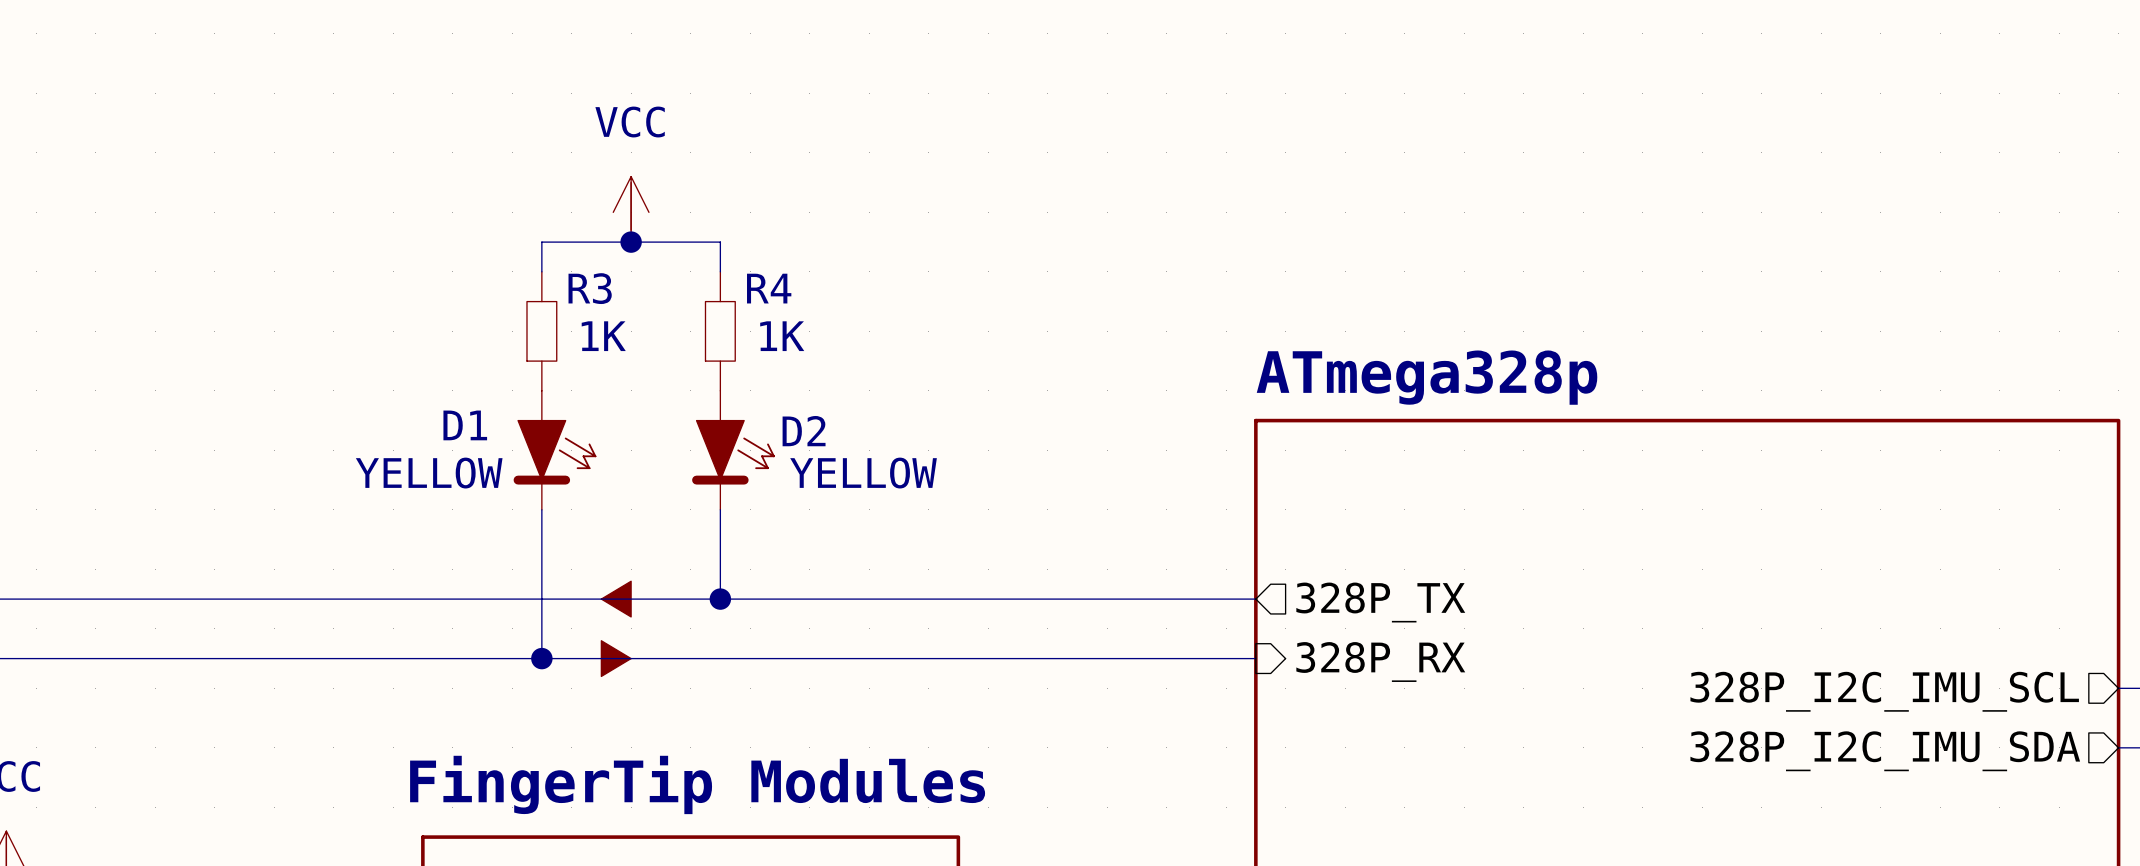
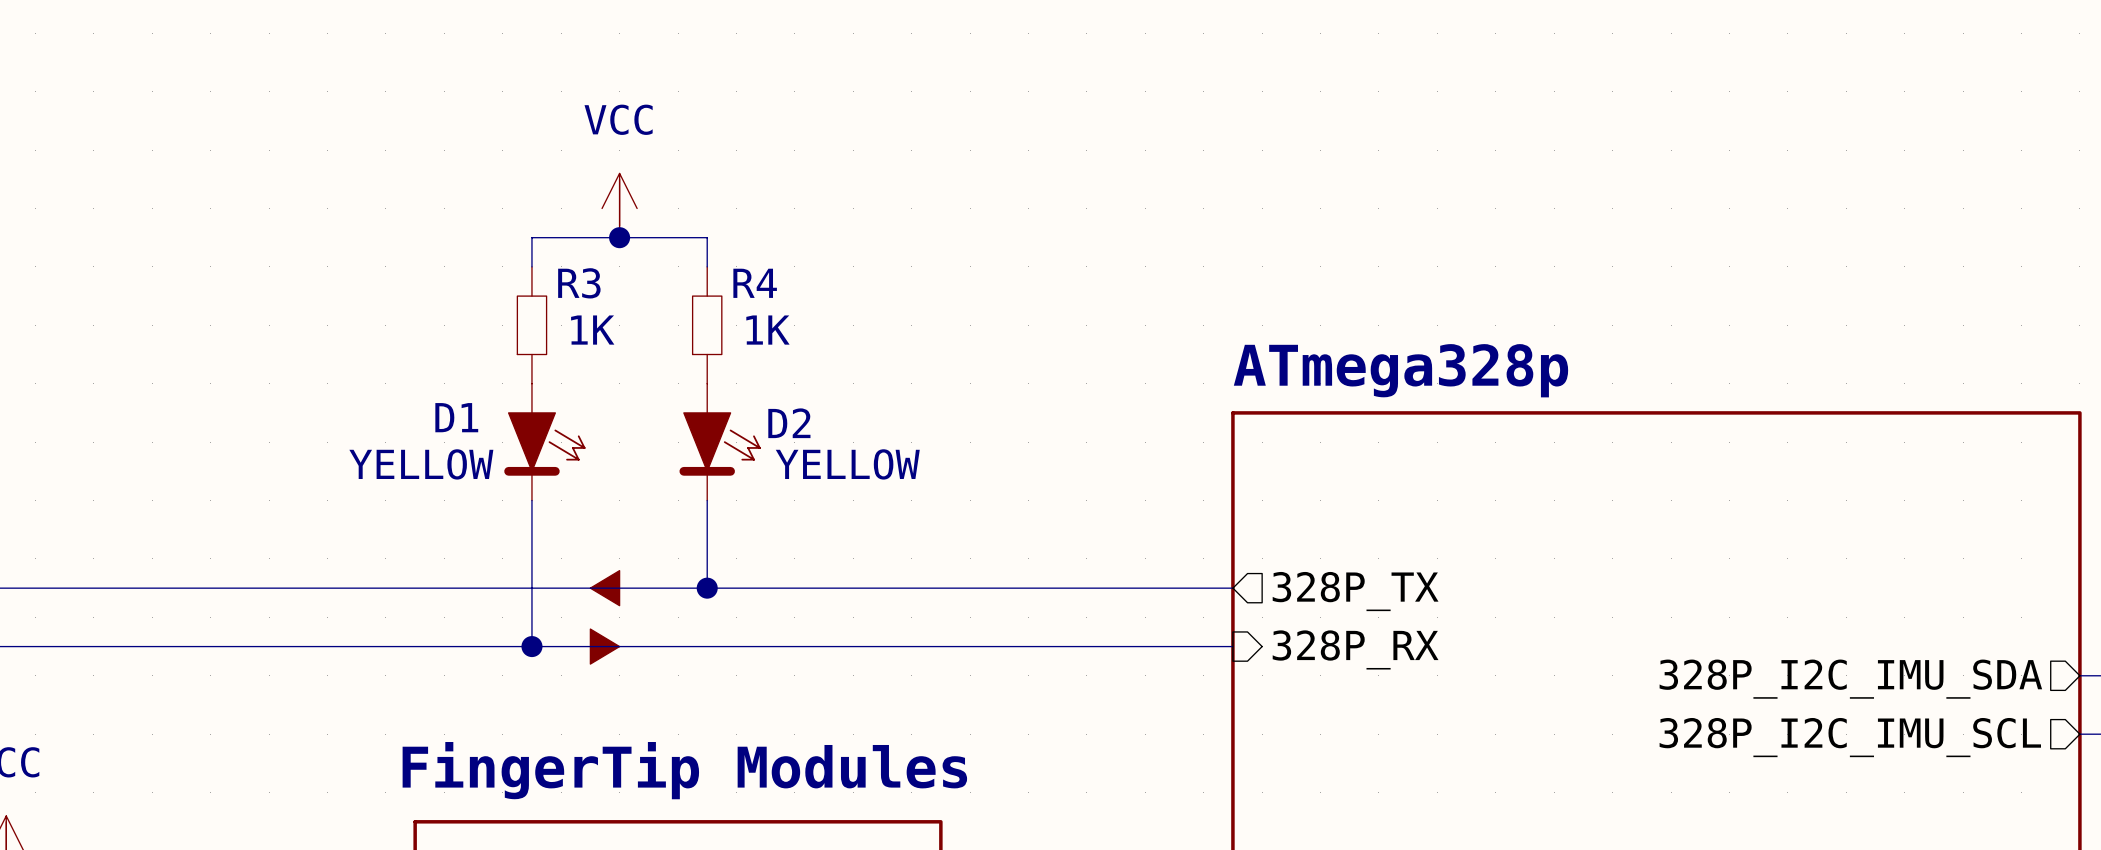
sheet pin: 328P_I2C_IMU_SCL (1884, 691) -> 328P_I2C_IMU_SDA (1850, 679)
sheet pin: 328P_I2C_IMU_SDA (1885, 751) -> 328P_I2C_IMU_SCL (1850, 737)

